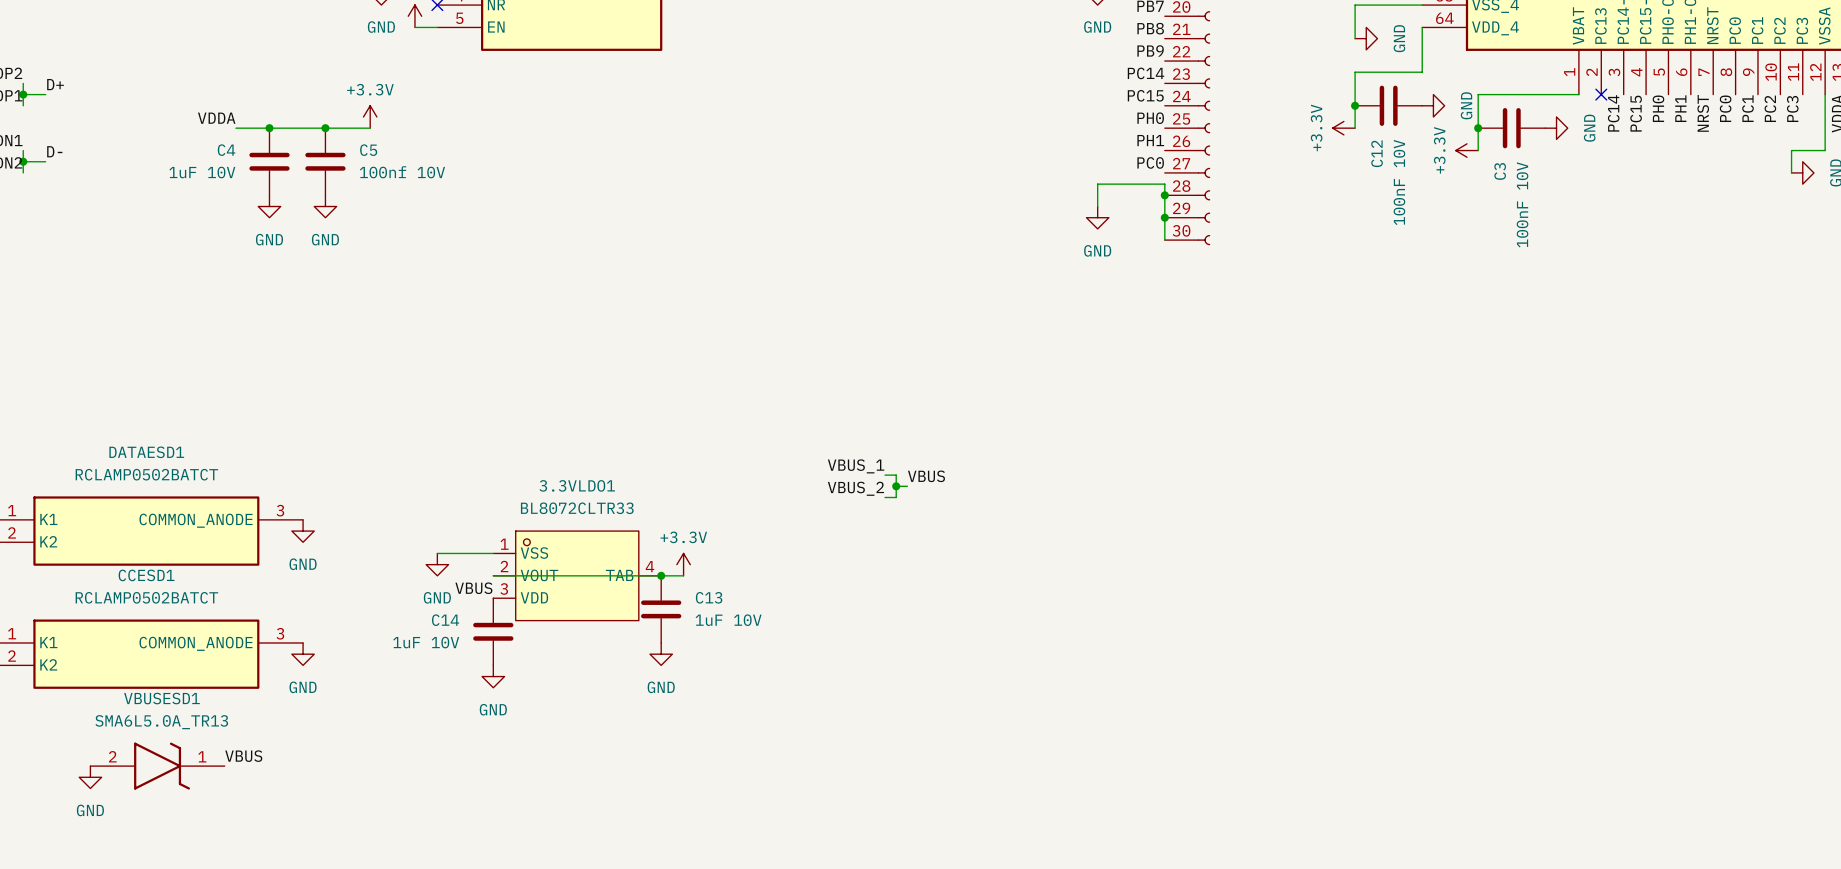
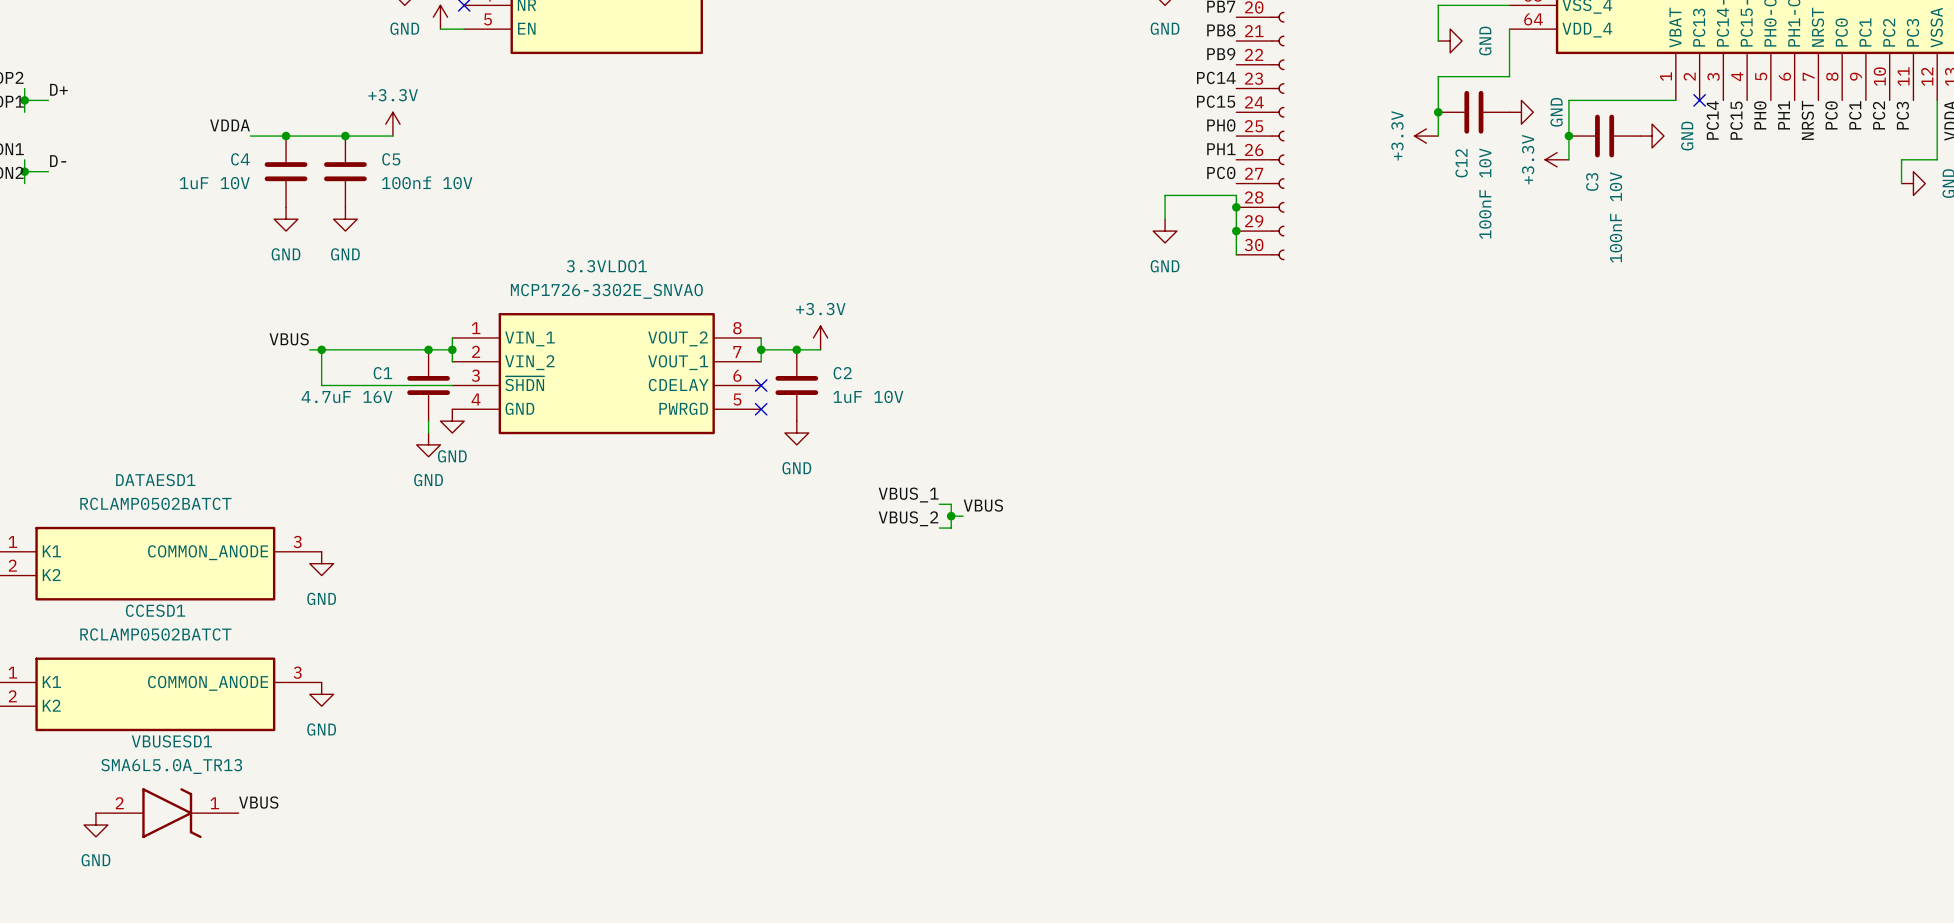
wire: none -> (452, 337) (452, 361)
wire: none -> (761, 337) (761, 361)
power symbol: none -> +3.3V (820, 337)
label: none -> VBUS (289, 339)
wire: none -> (309, 349) (452, 349)
wire: none -> (321, 349) (321, 385) (452, 385)
junction: none -> (321, 349)
junction: none -> (428, 349)
junction: none -> (452, 349)
wire: none -> (761, 349) (820, 349)
junction: none -> (761, 349)
junction: none -> (796, 349)
C1: none -> 4.7uF 16V (428, 385)
no-connect mark: none -> (761, 385)
C2: none -> 1uF 10V (796, 385)
no-connect mark: none -> (761, 409)
wire: none -> (428, 421) (428, 433)
power symbol: none -> GND (452, 421)
power symbol: none -> GND (796, 433)
power symbol: none -> GND (428, 444)
3.3VLDO1 value: BL8072CLTR33 (577, 508) -> MCP1726-3302E_SNVAO (606, 291)
3.3VLDO1 symbol: [493, 531, 662, 621] -> [452, 313, 762, 435]
wire: (437, 553) (493, 553) -> none
power symbol: GND (437, 564) -> none
power symbol: +3.3V (683, 564) -> none
wire: (493, 575) (683, 575) -> none
junction: (661, 575) -> none
label: VBUS (473, 588) -> none
C13: 1uF 10V (661, 609) -> none
C14: 1uF 10V (493, 631) -> none
power symbol: GND (661, 654) -> none
power symbol: GND (493, 676) -> none

